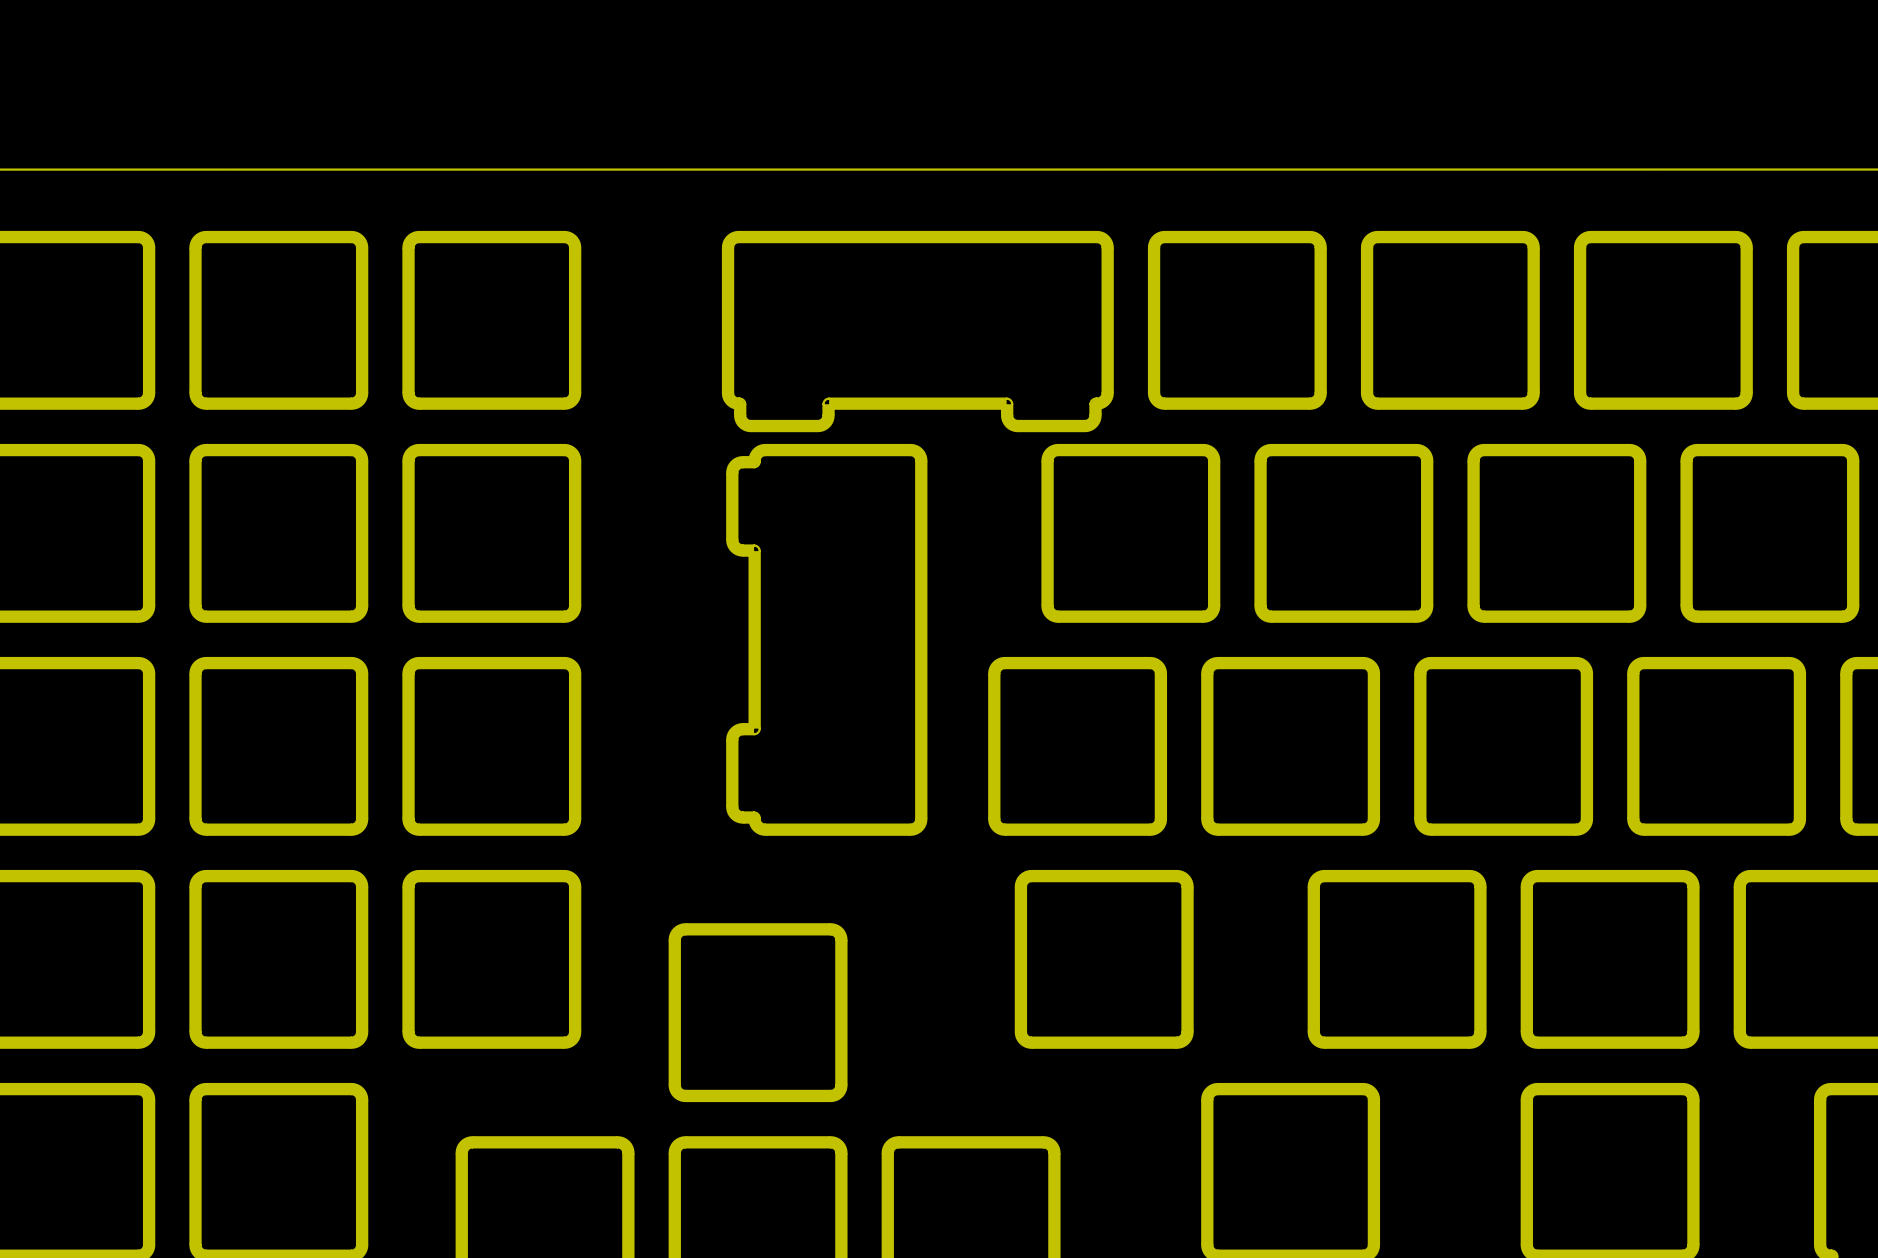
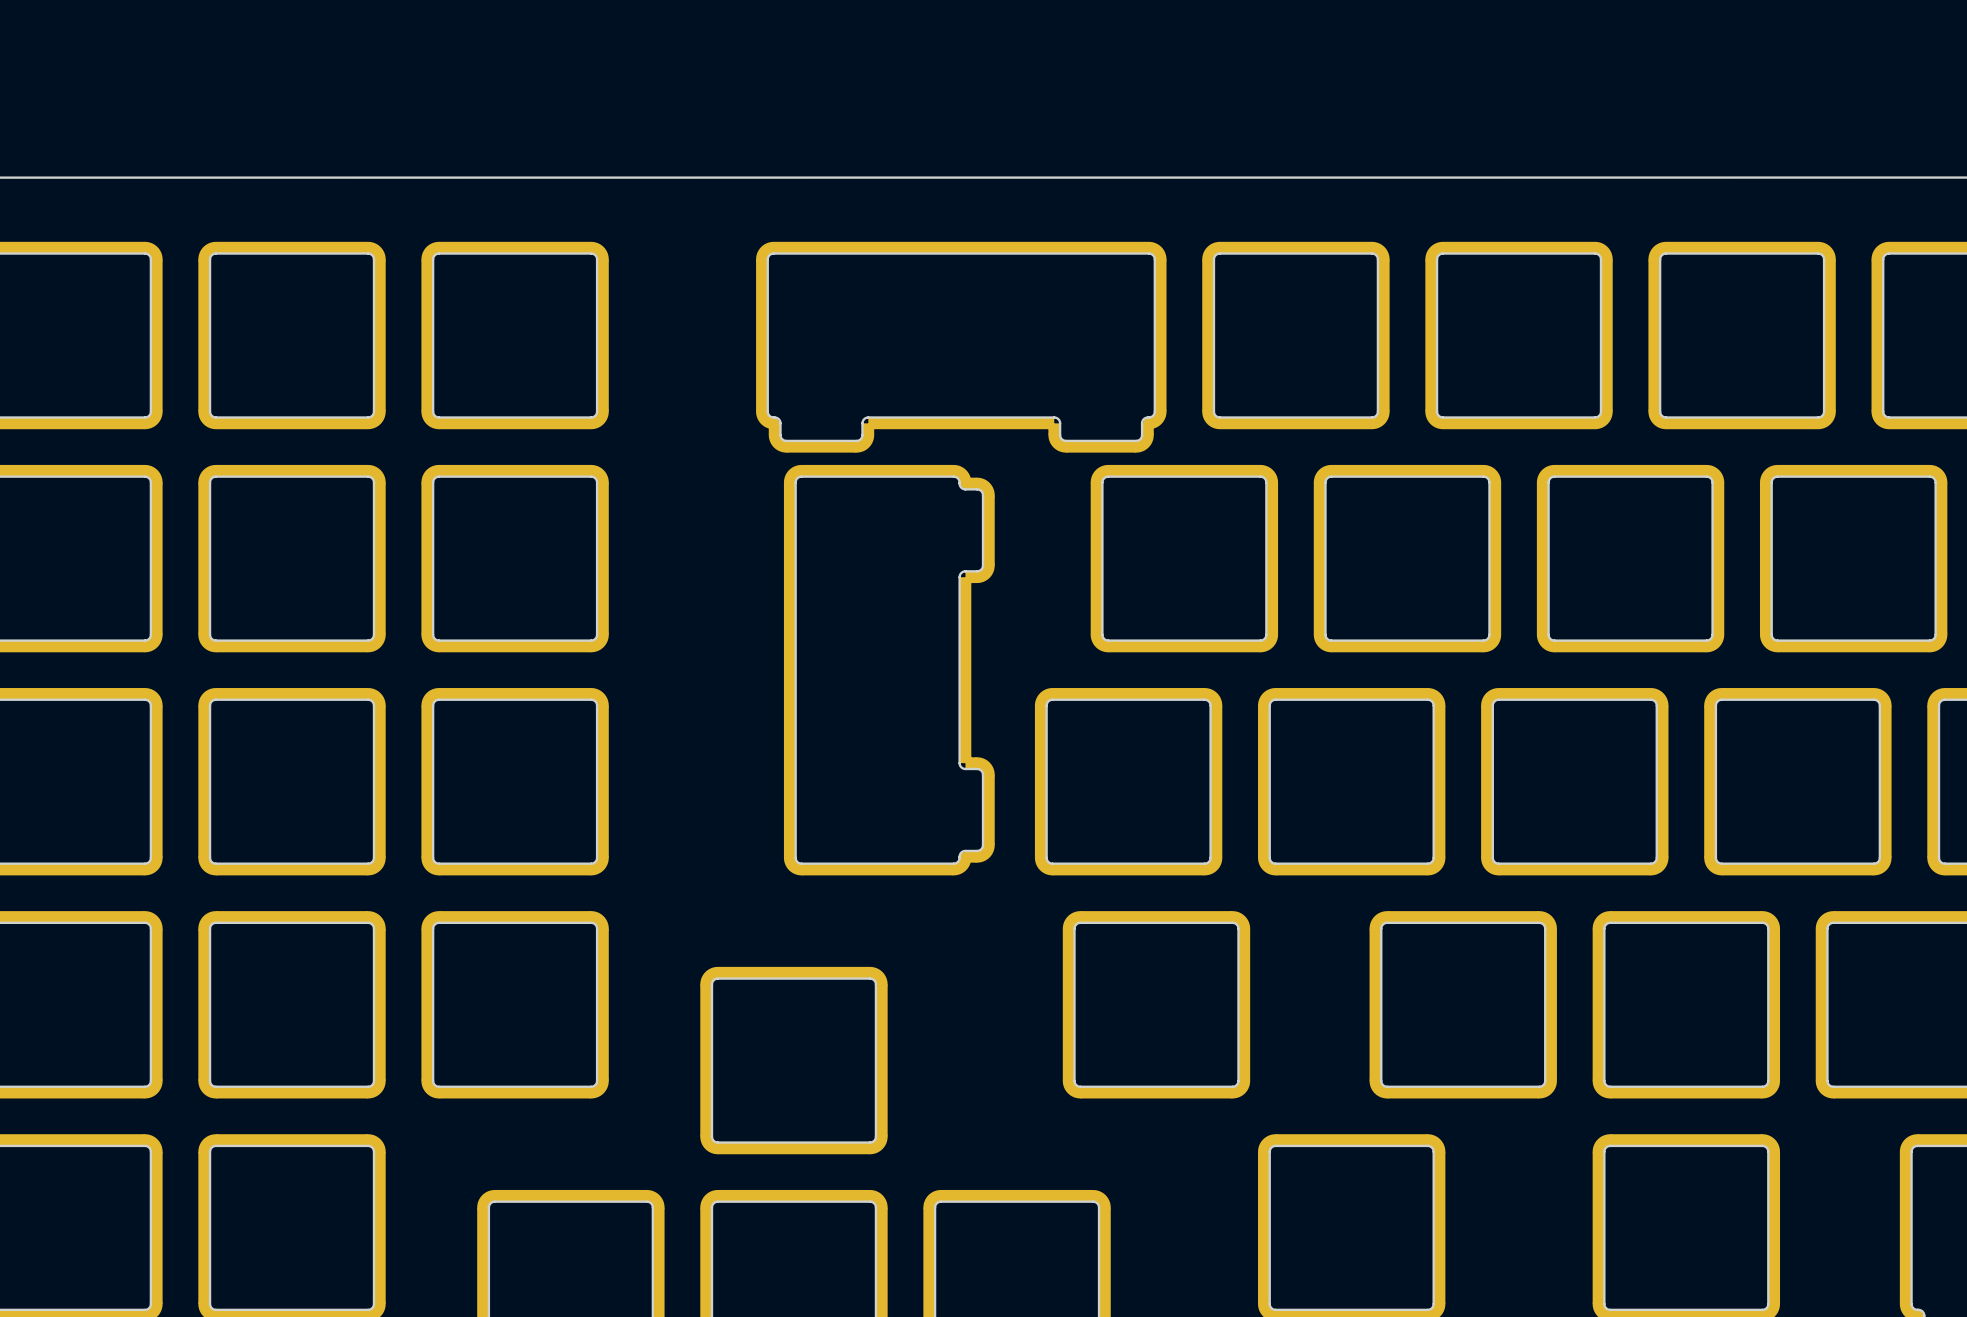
part rotation: 0° (826, 639) -> 180° (889, 670)

